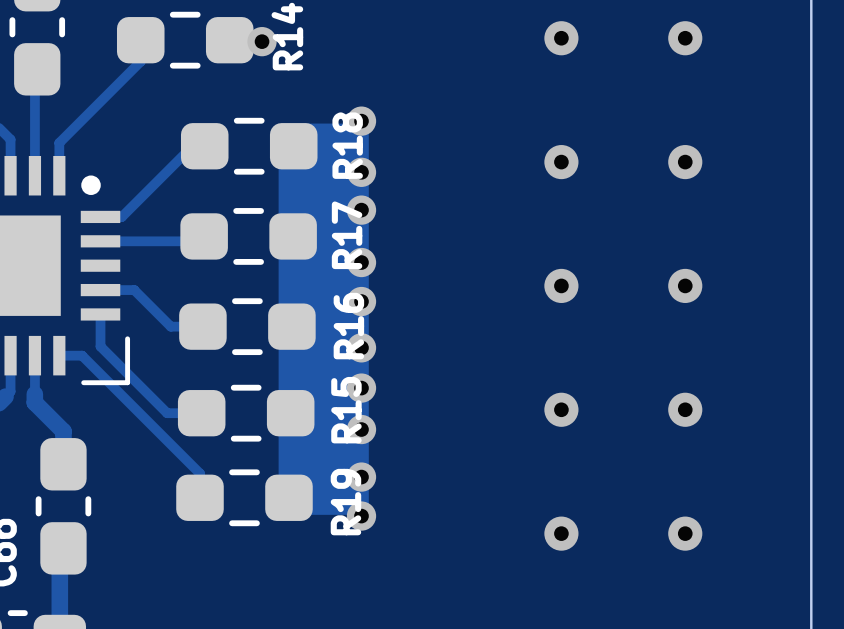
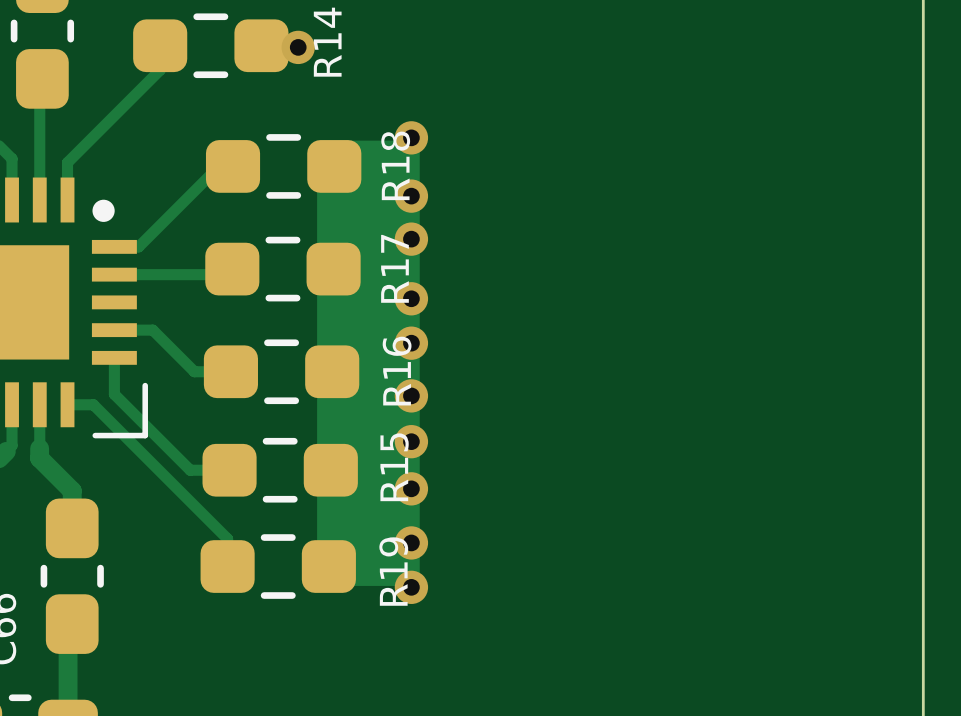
via: (561, 38) -> none
via: (685, 38) -> none
via: (561, 162) -> none
via: (685, 162) -> none
via: (561, 285) -> none
via: (685, 285) -> none
via: (561, 409) -> none
via: (685, 409) -> none
via: (561, 533) -> none
via: (685, 533) -> none

